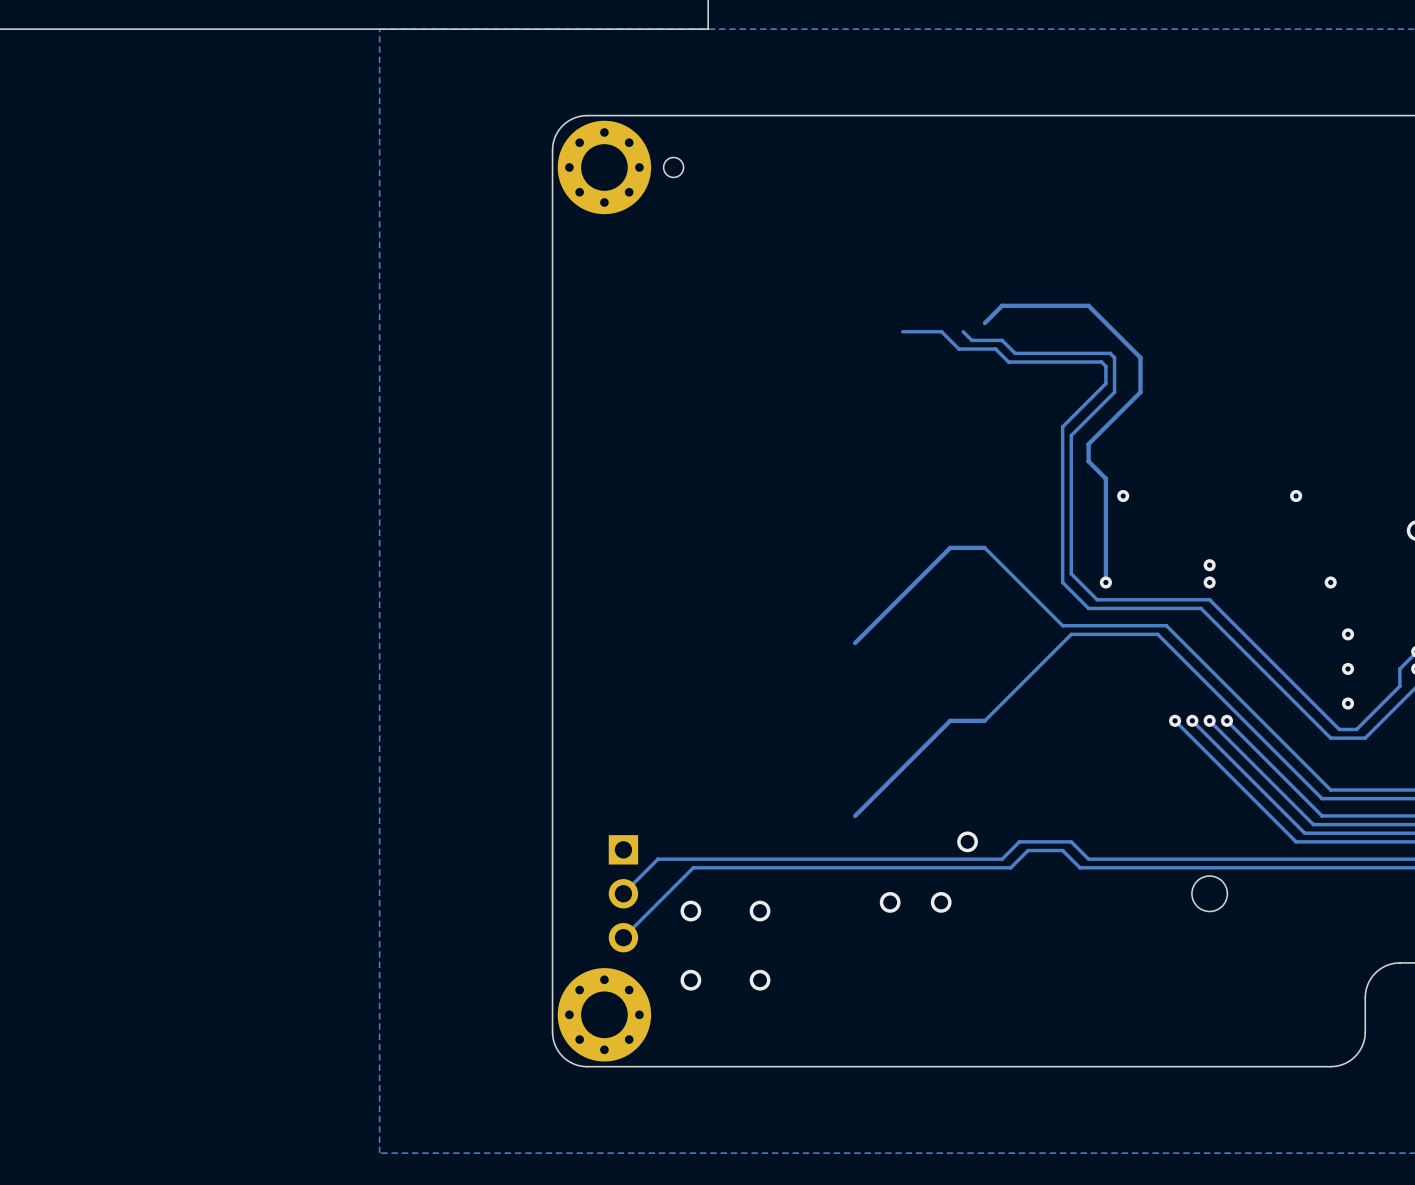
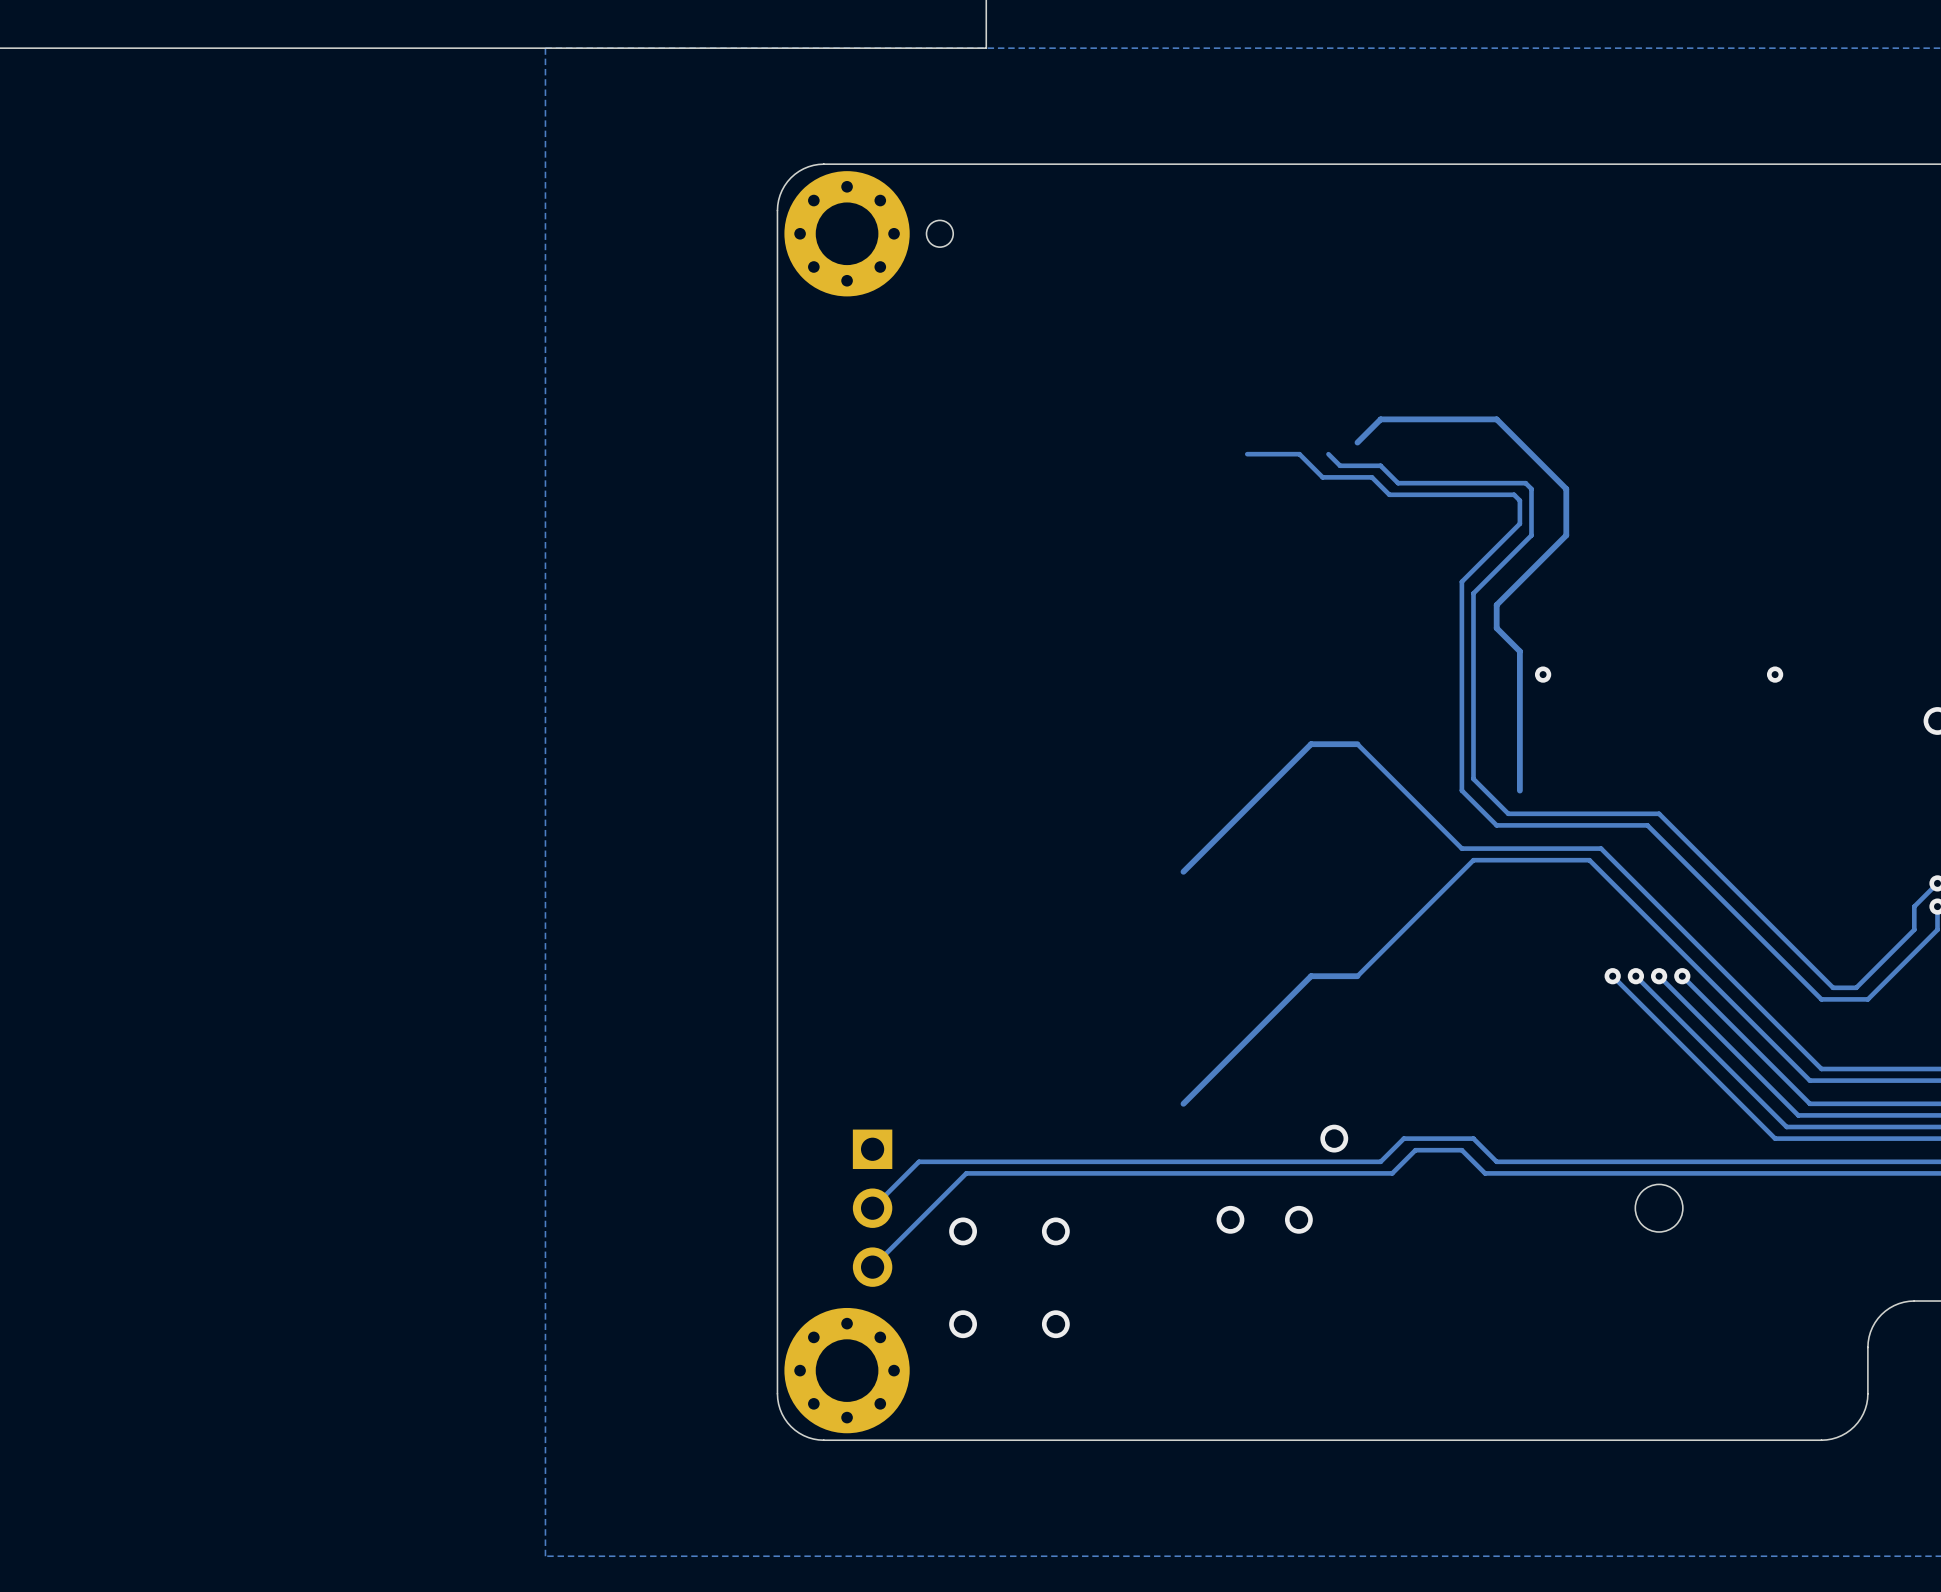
via: (1209, 565) -> none
via: (1105, 582) -> none
via: (1209, 582) -> none
via: (1330, 582) -> none
via: (1347, 634) -> none
via: (1347, 668) -> none
via: (1347, 703) -> none

